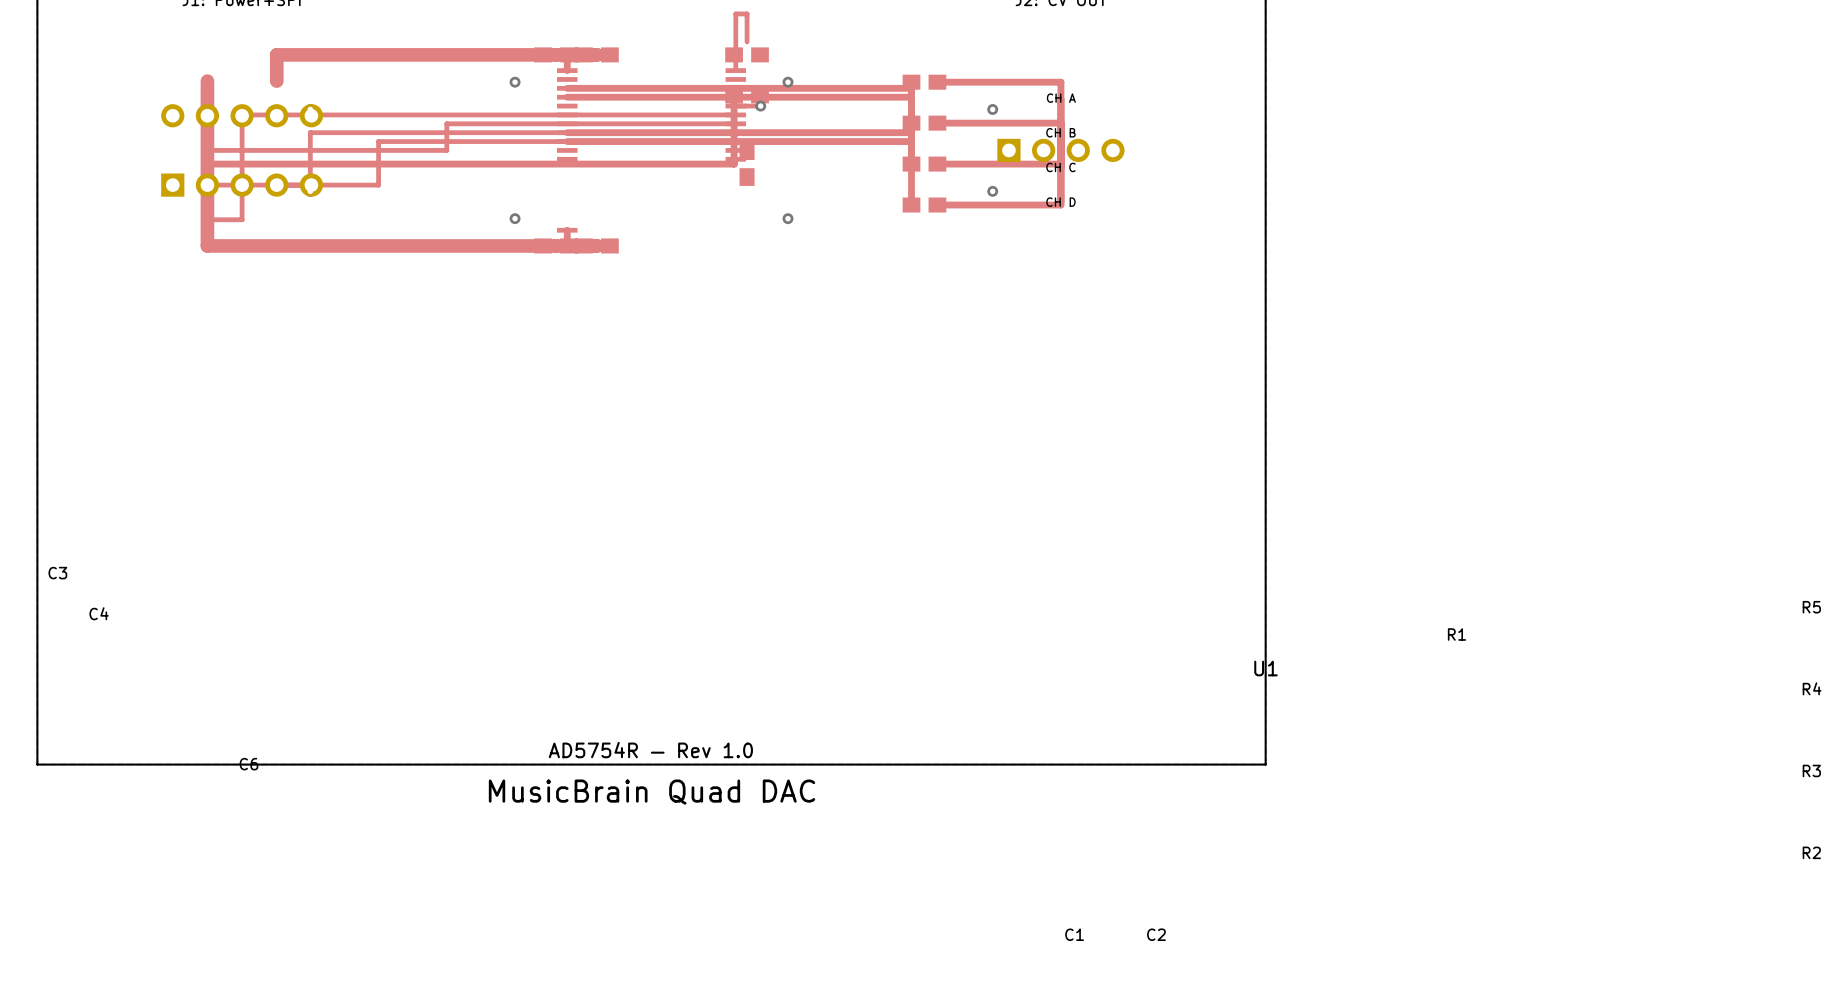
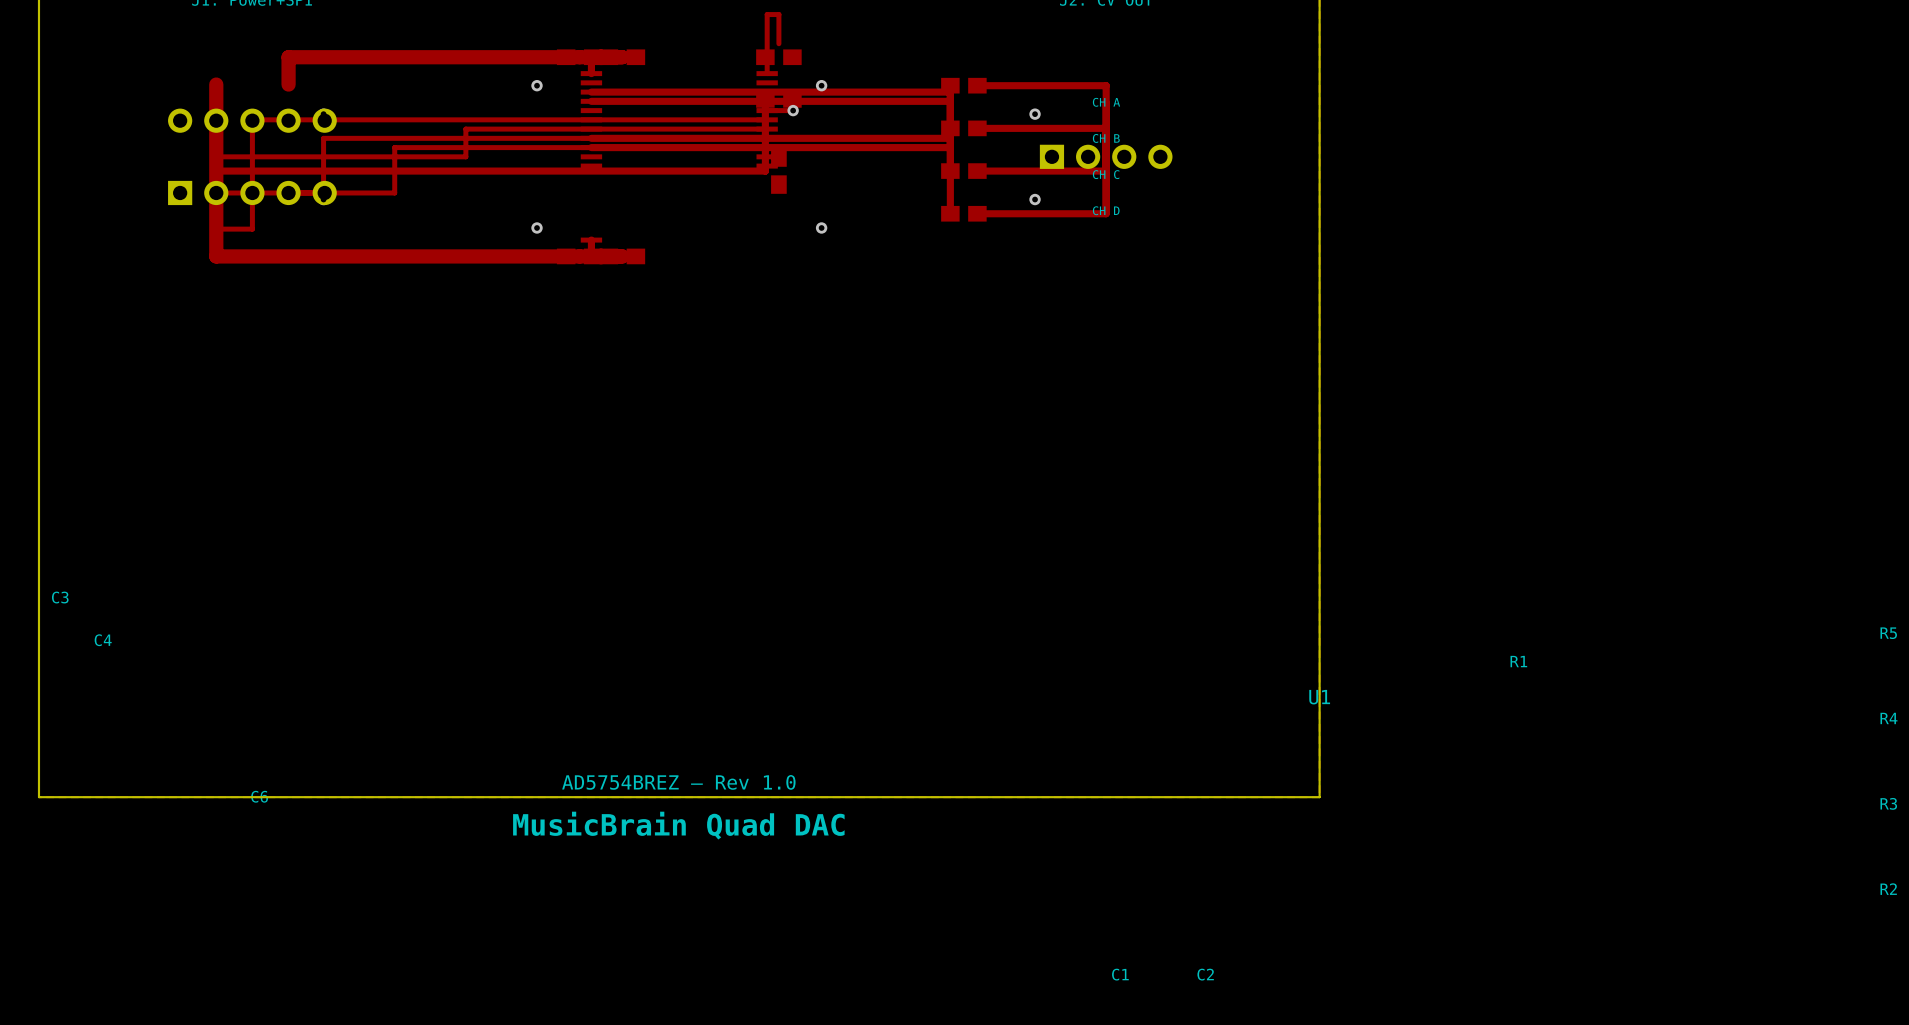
text: AD5754R — Rev 1.0 (650, 750) -> AD5754BREZ — Rev 1.0 (678, 782)

